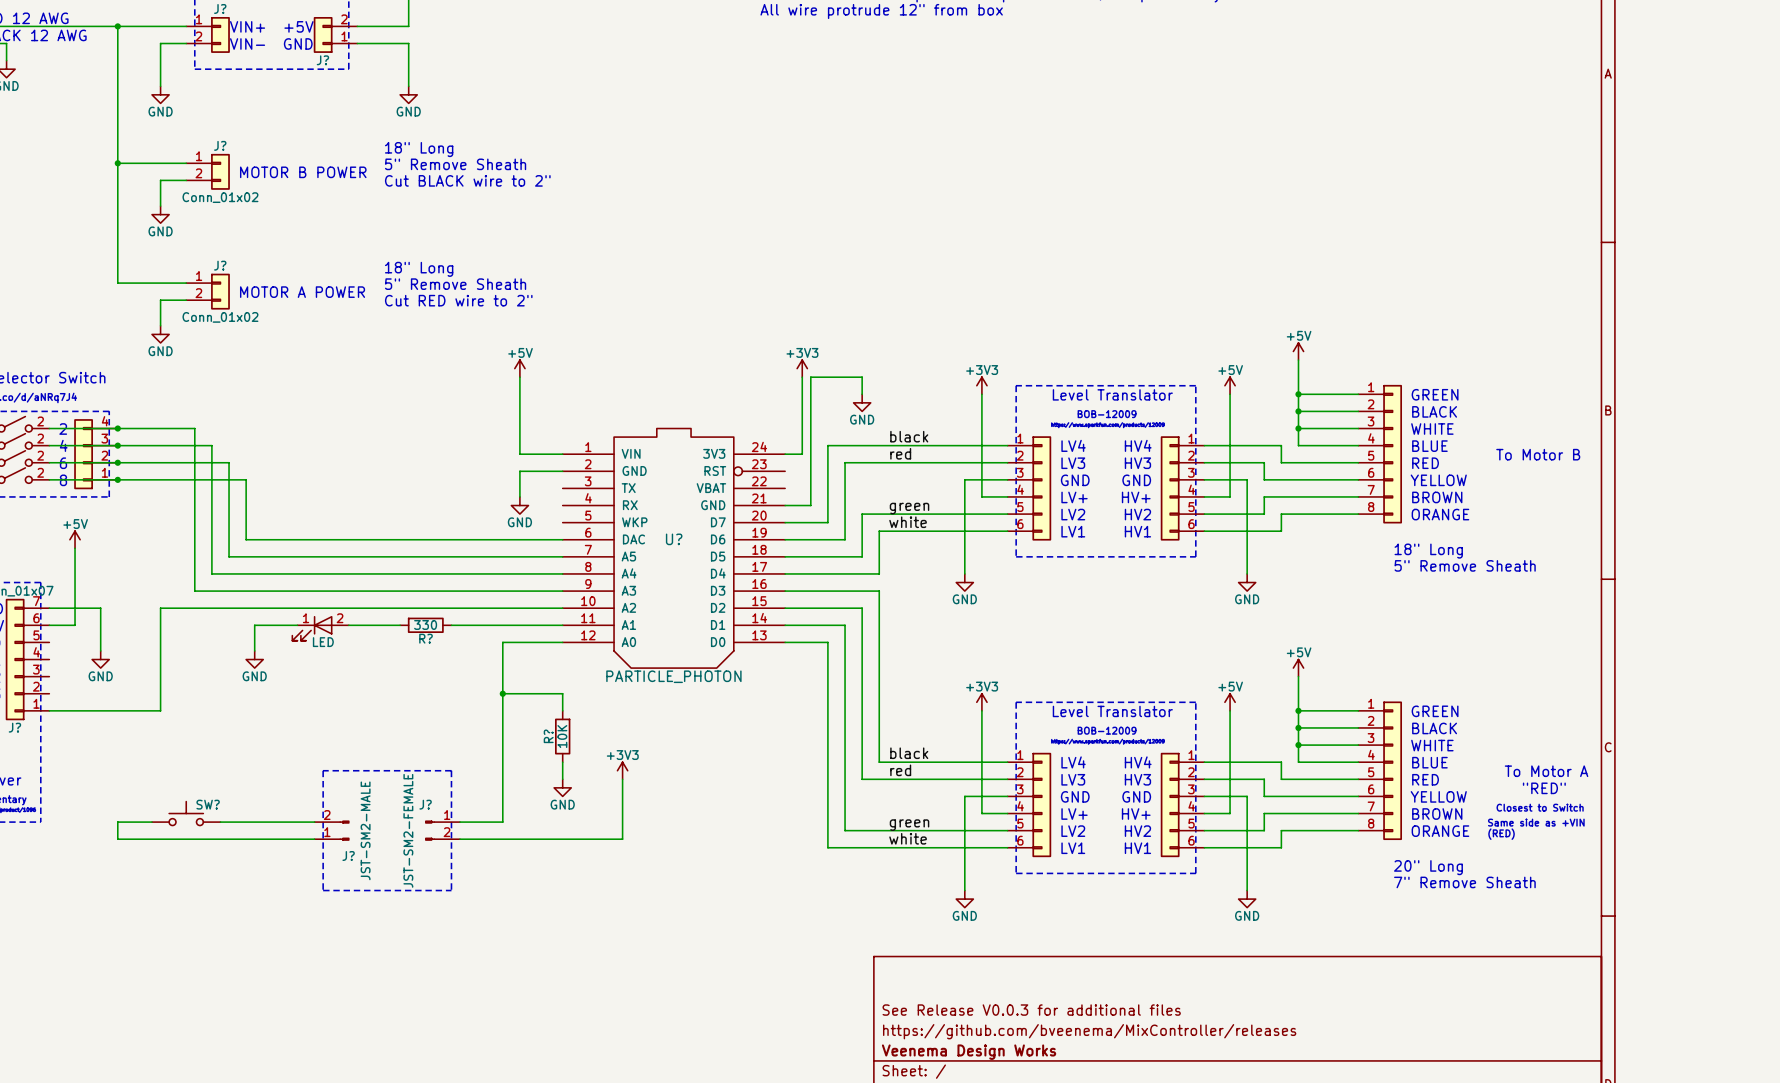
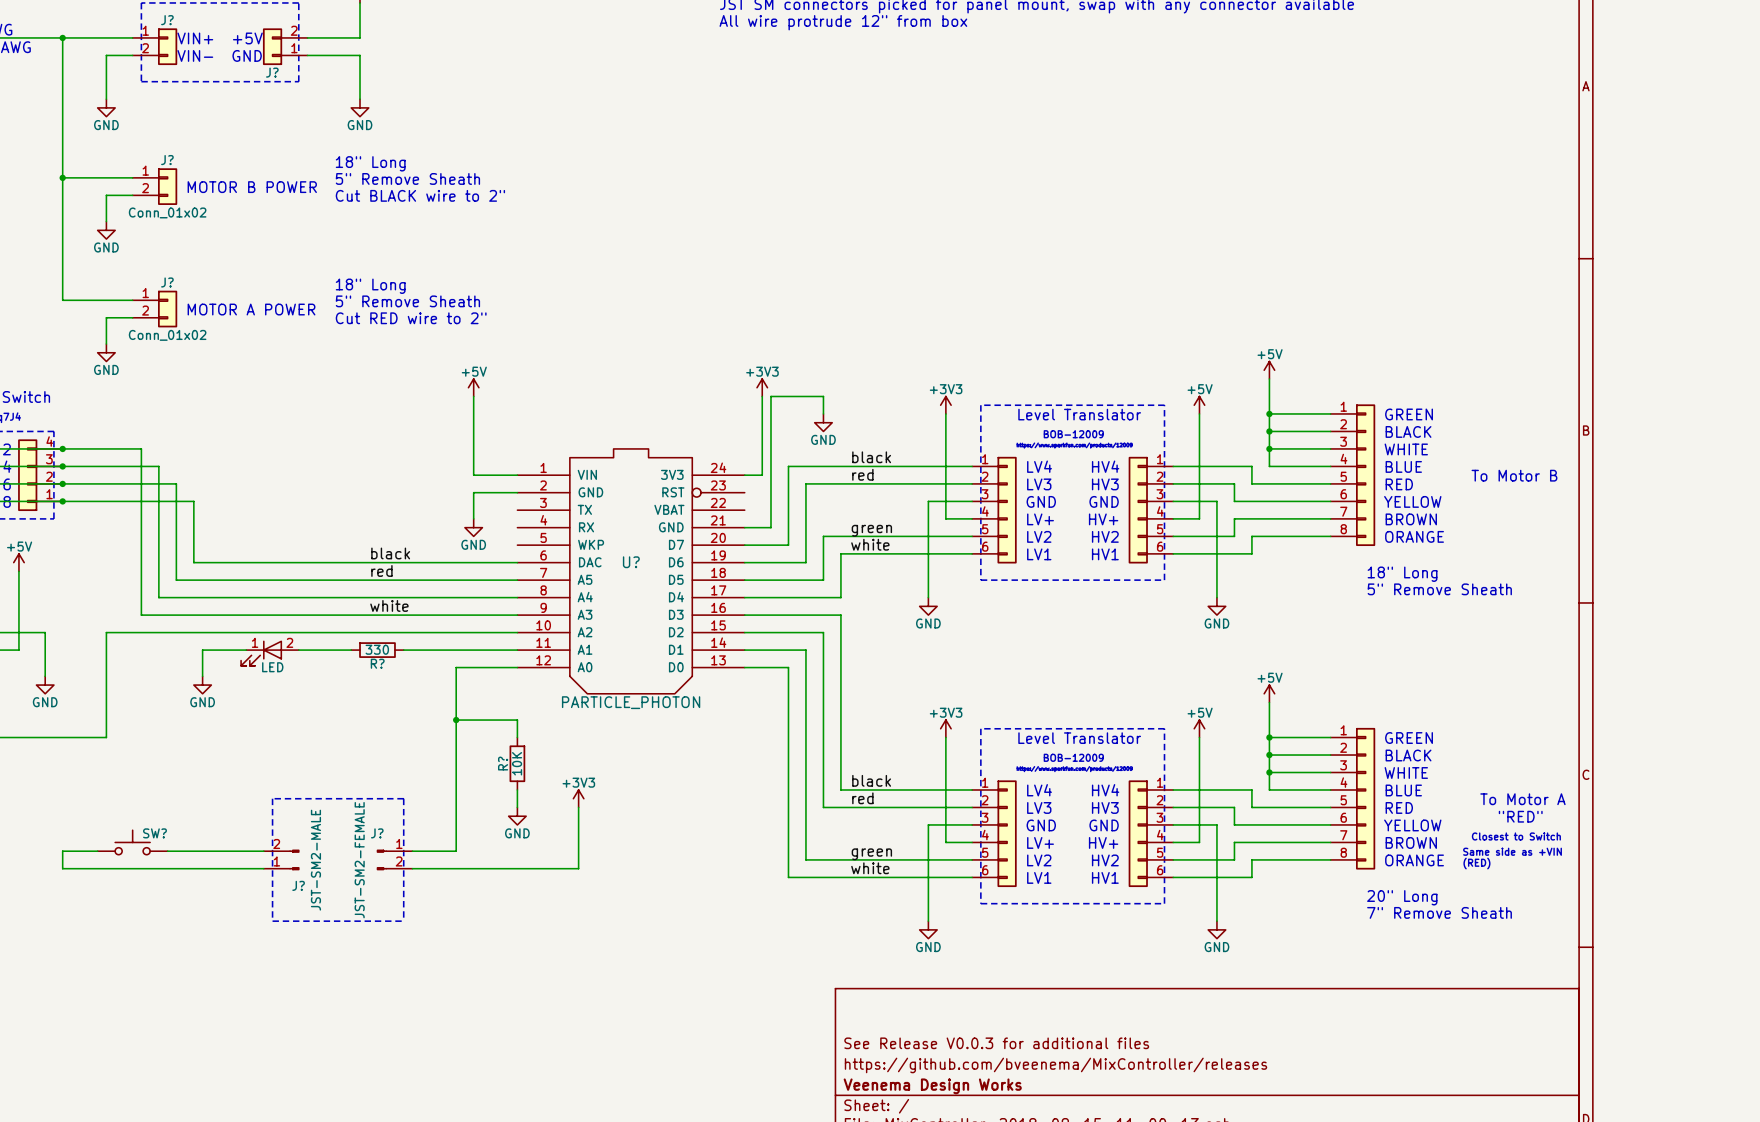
label: none -> black (390, 553)
label: none -> red (381, 570)
label: none -> white (389, 605)

